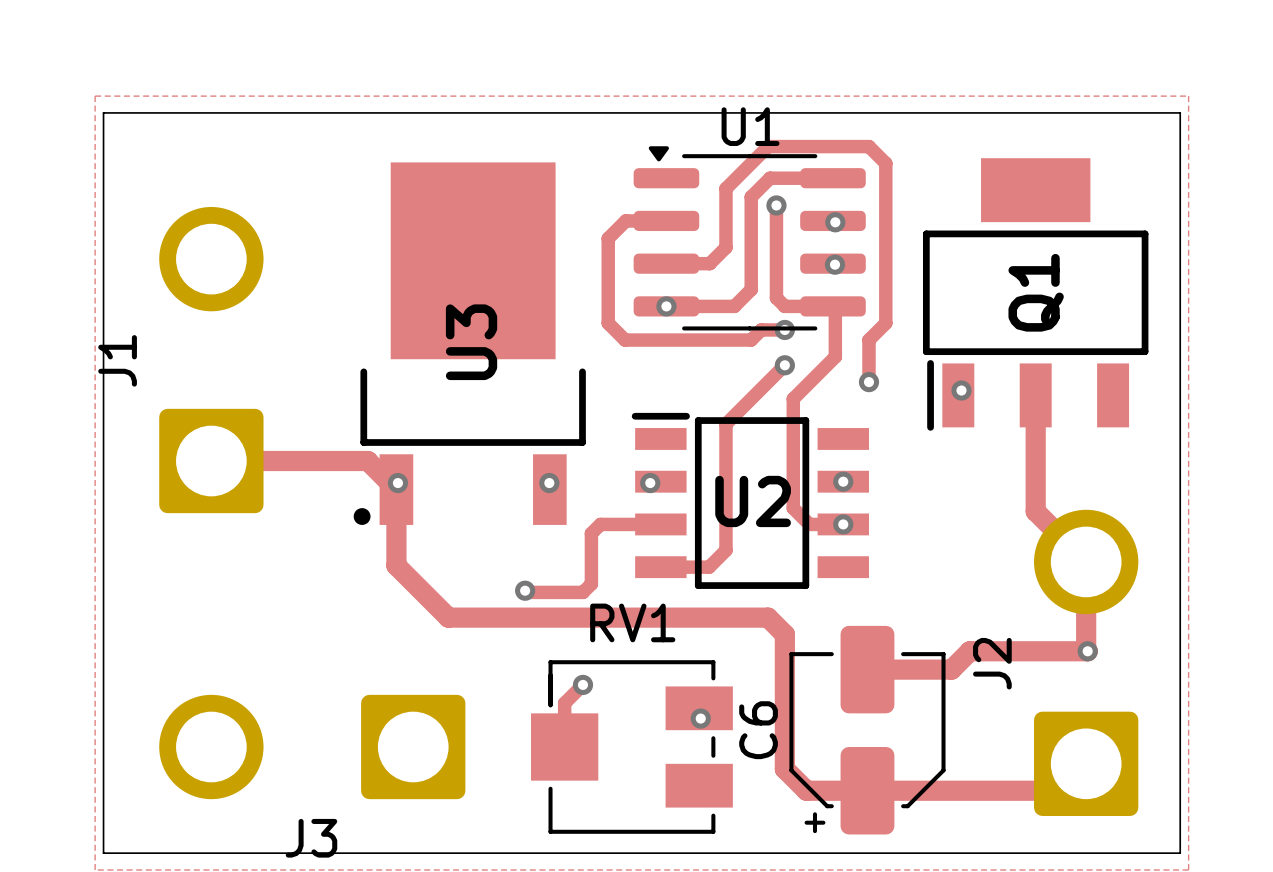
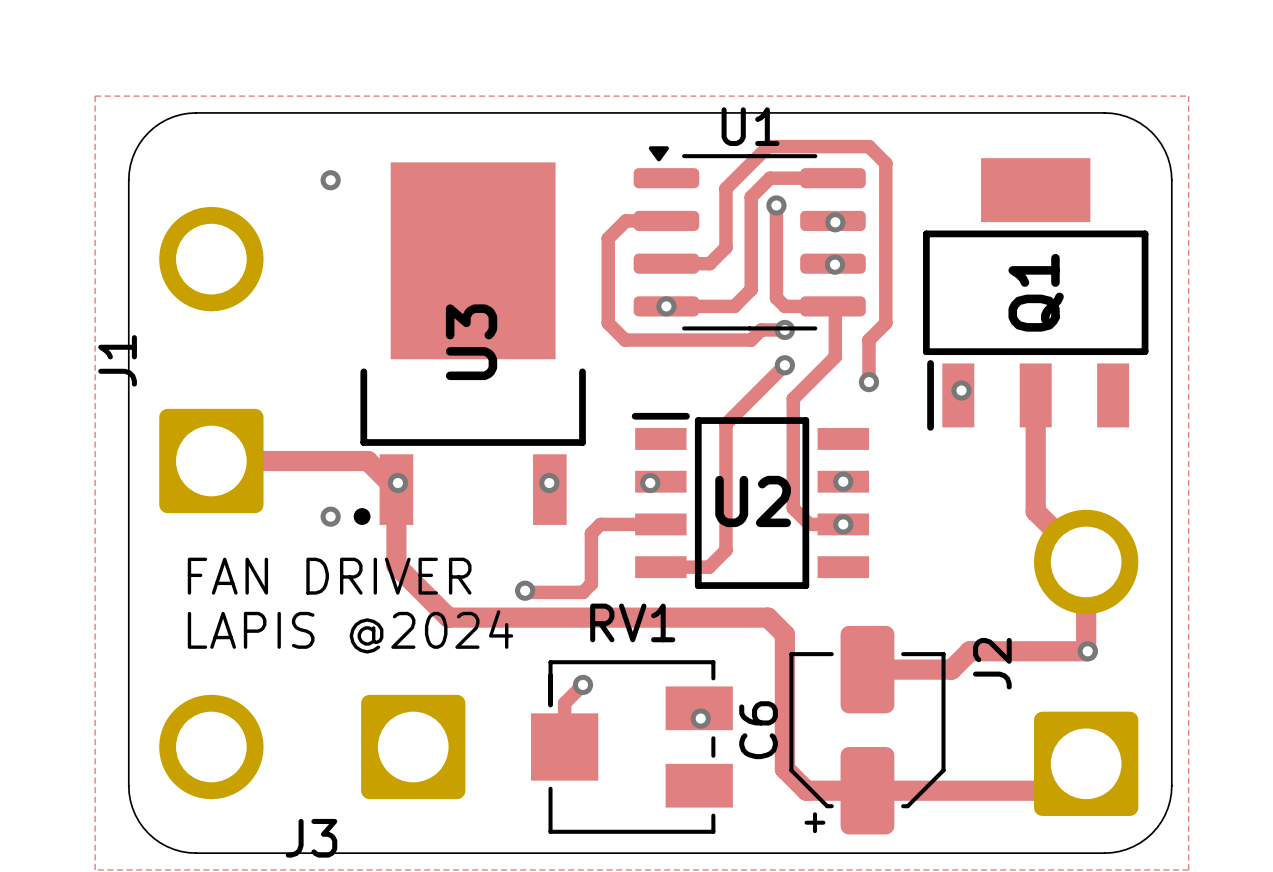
board edge: (196, 112) (103, 112) (103, 853) (196, 853) -> (196, 112) (173, 116) (160, 123) (148, 132) (139, 144) (132, 158) (128, 180) (129, 793) (132, 808) (139, 821) (154, 838) (173, 849) (196, 853)
board edge: (1104, 112) (1180, 112) (1180, 853) (1104, 853) -> (1104, 112) (1119, 114) (1133, 119) (1152, 132) (1161, 144) (1168, 158) (1171, 180) (1171, 793) (1165, 815) (1152, 833) (1133, 846) (1119, 851) (1104, 853)
via: none -> (330, 180)
via: none -> (330, 516)
text: none -> FAN DRIVER (329, 576)
text: none -> LAPIS @2024 (350, 631)

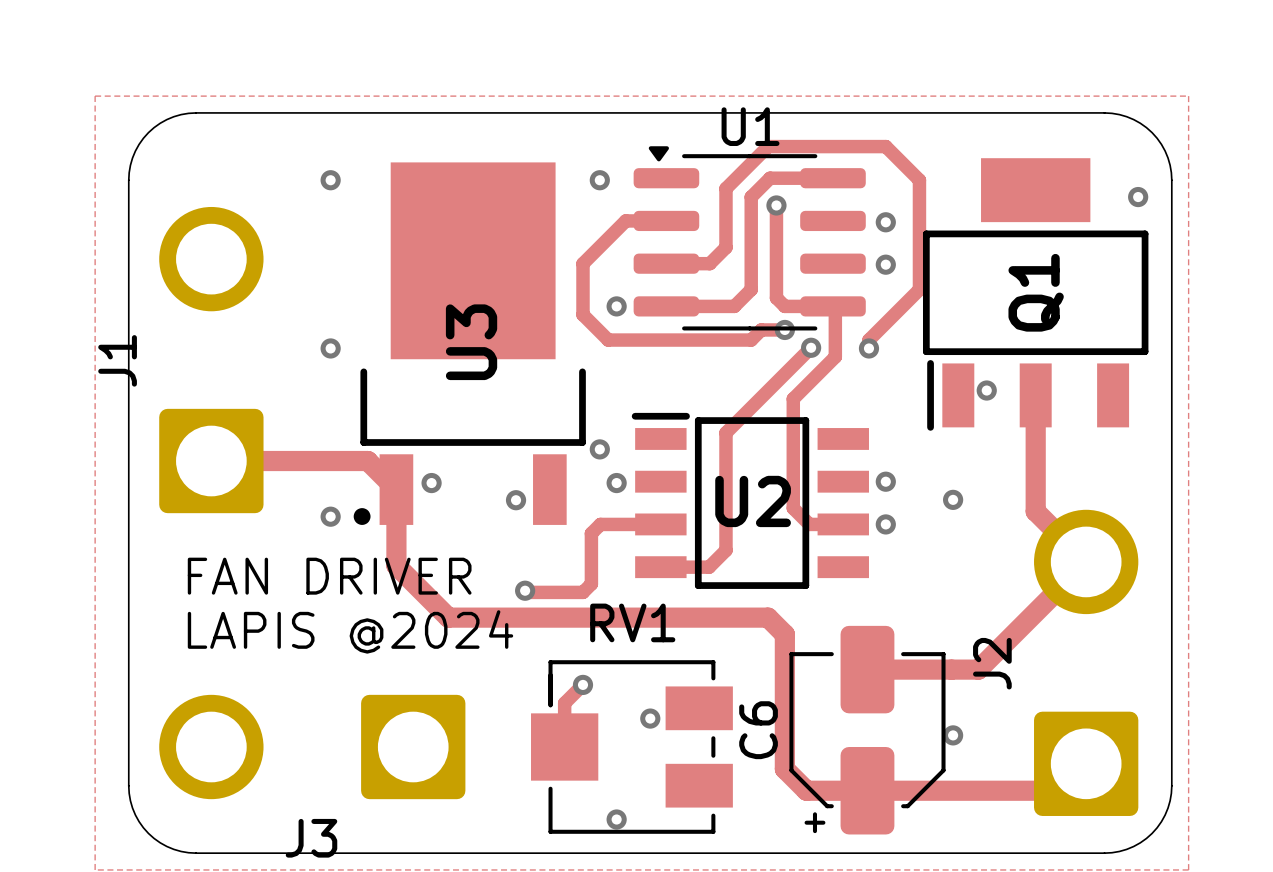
track: (868, 146) (885, 163) (885, 323) -> (868, 146) (885, 146) (919, 180) (919, 289) (885, 323)
via: none -> (599, 180)
via: none -> (1138, 197)
via: (835, 222) -> none
via: none -> (885, 222)
track: (608, 238) (608, 323) (625, 340) -> (608, 238) (582, 263) (582, 314) (608, 340) (625, 340)
via: (835, 264) -> none
via: none -> (885, 264)
via position: (666, 306) -> (616, 306)
via: none -> (330, 348)
track: (868, 348) (868, 382) -> none
via: none -> (868, 348)
track: (784, 365) (725, 424) (725, 432) -> (811, 347) (725, 432)
via position: (784, 365) -> (811, 347)
via: (868, 382) -> none
via position: (961, 390) -> (986, 390)
via: none -> (599, 449)
via: (843, 481) -> none
via: none -> (885, 481)
via position: (397, 483) -> (431, 483)
via: (549, 483) -> none
via: none -> (616, 483)
via: (650, 483) -> none
via: none -> (953, 499)
via: none -> (516, 500)
via: (843, 524) -> none
via: none -> (885, 524)
track: (1086, 561) (1087, 651) (969, 651) (951, 669) -> (1086, 561) (978, 669) (951, 669)
via: (1087, 651) -> none
via position: (700, 718) -> (650, 718)
via: none -> (953, 735)
via: none -> (616, 819)

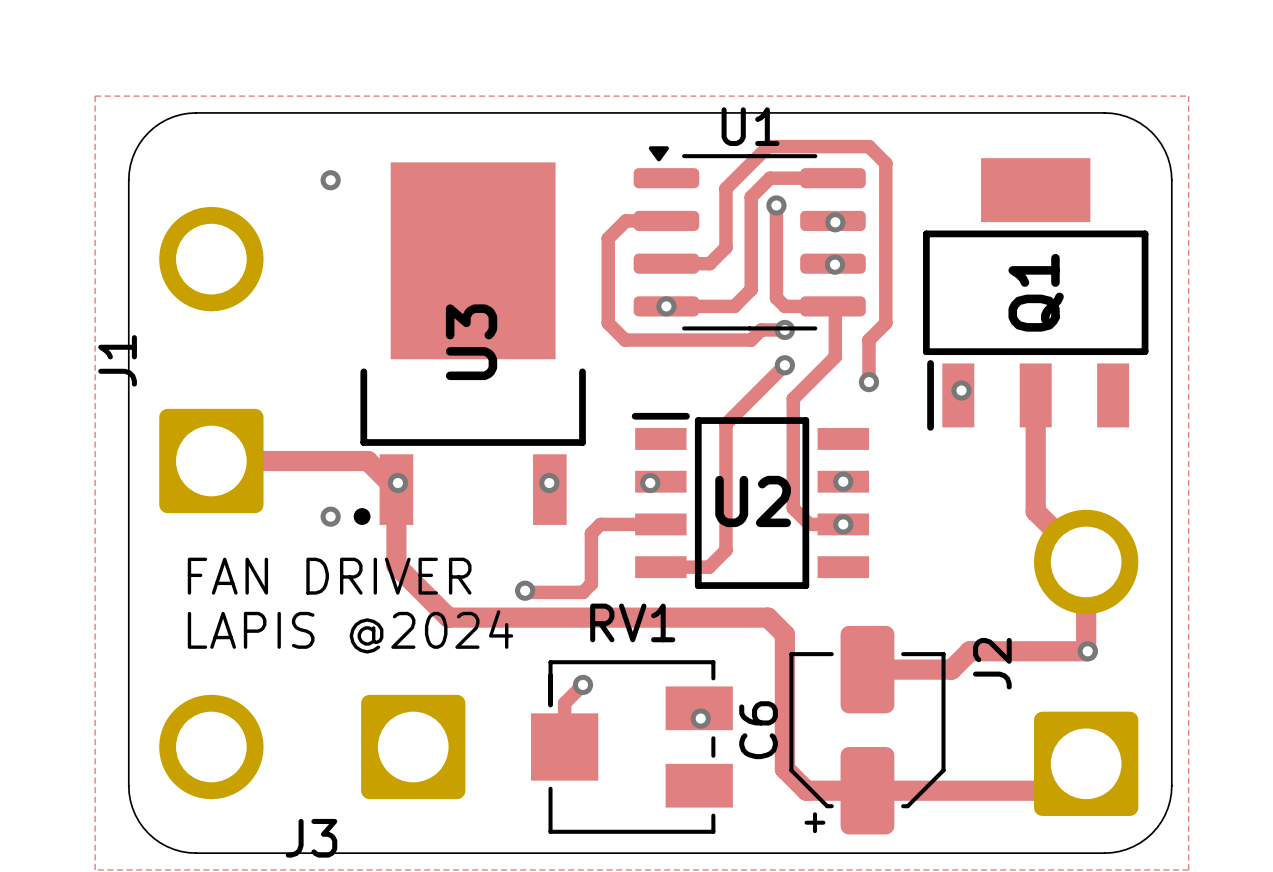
track: (868, 146) (885, 146) (919, 180) (919, 289) (885, 323) -> (868, 146) (885, 163) (885, 323)
via: (599, 180) -> none
via: (1138, 197) -> none
via: none -> (835, 222)
via: (885, 222) -> none
track: (608, 238) (582, 263) (582, 314) (608, 340) (625, 340) -> (608, 238) (608, 323) (625, 340)
via: none -> (835, 264)
via: (885, 264) -> none
via position: (616, 306) -> (666, 306)
track: (811, 347) (725, 432) -> (784, 365) (725, 424) (725, 432)
via position: (811, 347) -> (784, 365)
via: (330, 348) -> none
track: none -> (868, 348) (868, 382)
via: (868, 348) -> none
via: none -> (868, 382)
via position: (986, 390) -> (961, 390)
via: (599, 449) -> none
via: none -> (843, 481)
via: (885, 481) -> none
via position: (431, 483) -> (397, 483)
via: none -> (549, 483)
via: (616, 483) -> none
via: none -> (650, 483)
via: (953, 499) -> none
via: (516, 500) -> none
via: none -> (843, 524)
via: (885, 524) -> none
track: (1086, 561) (978, 669) (951, 669) -> (1086, 561) (1087, 651) (969, 651) (951, 669)
via: none -> (1087, 651)
via position: (650, 718) -> (700, 718)
via: (953, 735) -> none
via: (616, 819) -> none

